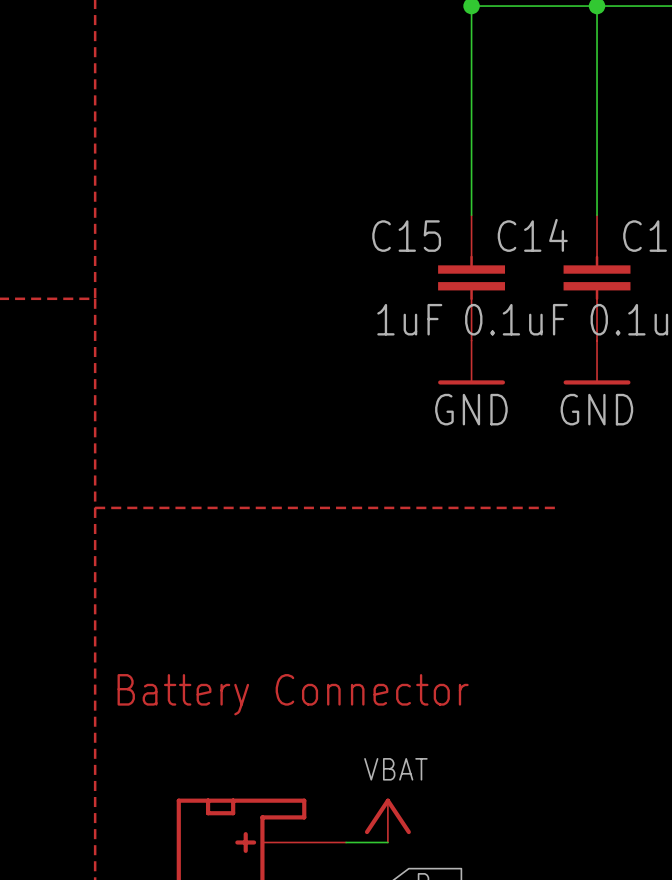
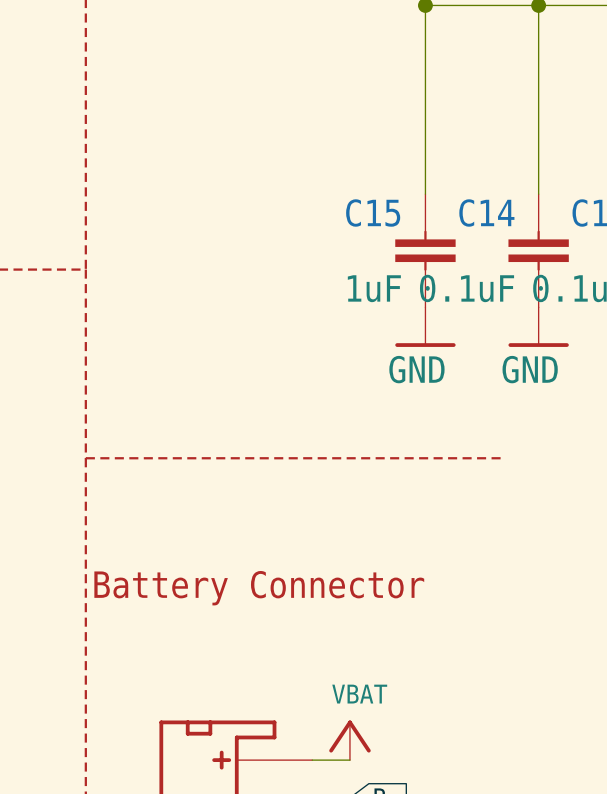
text position: Battery Connector (293, 694) -> Battery Connector (259, 588)

